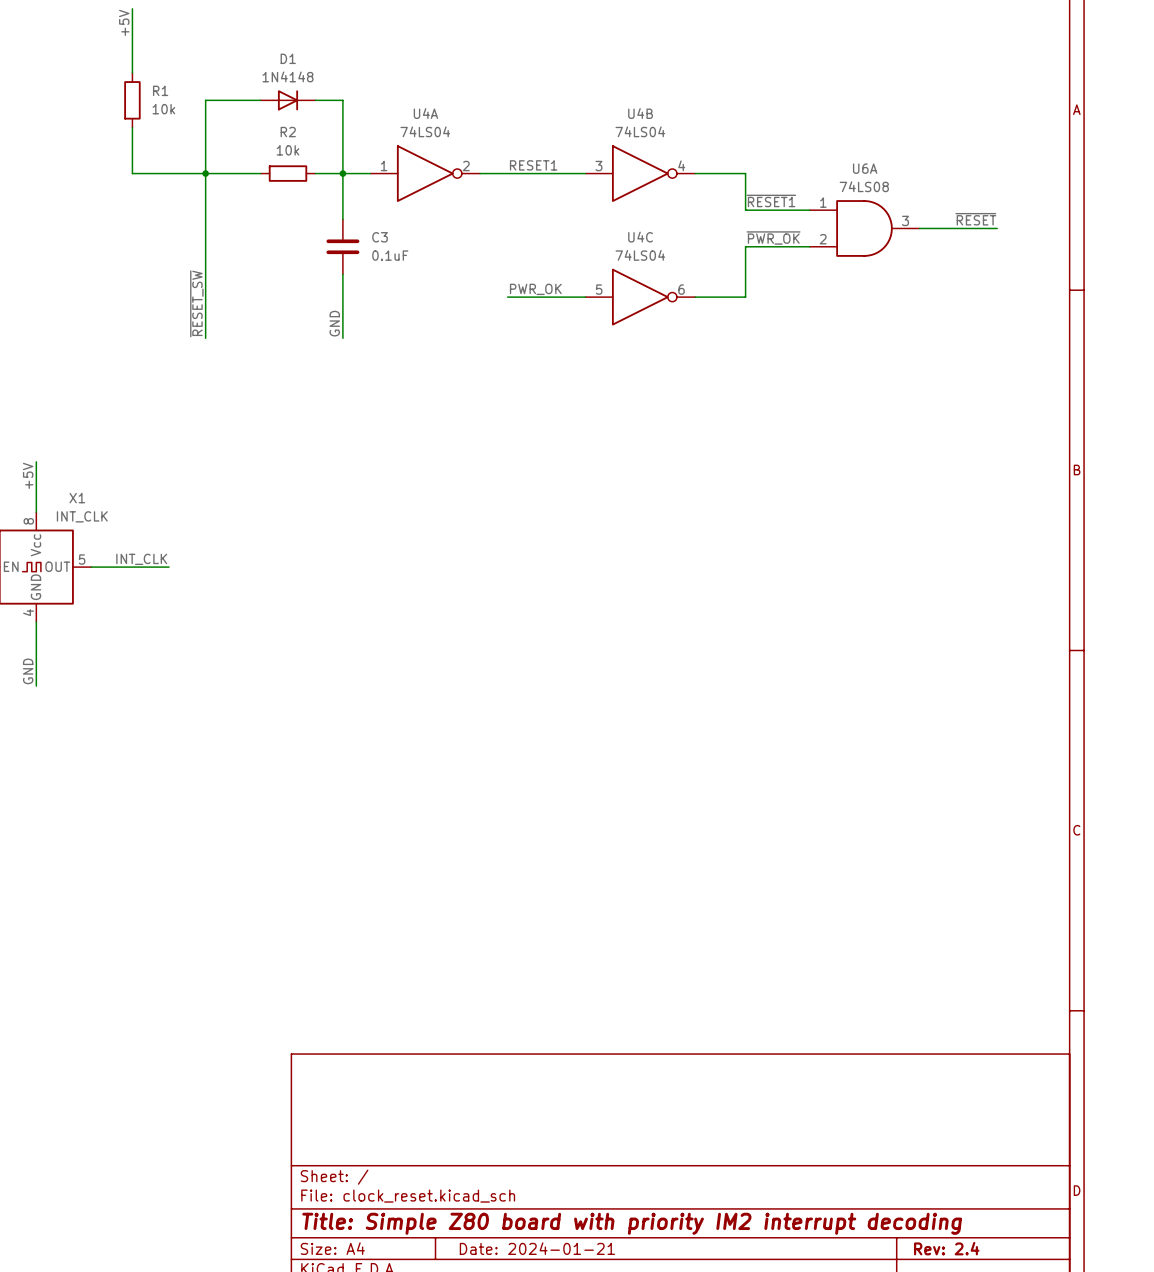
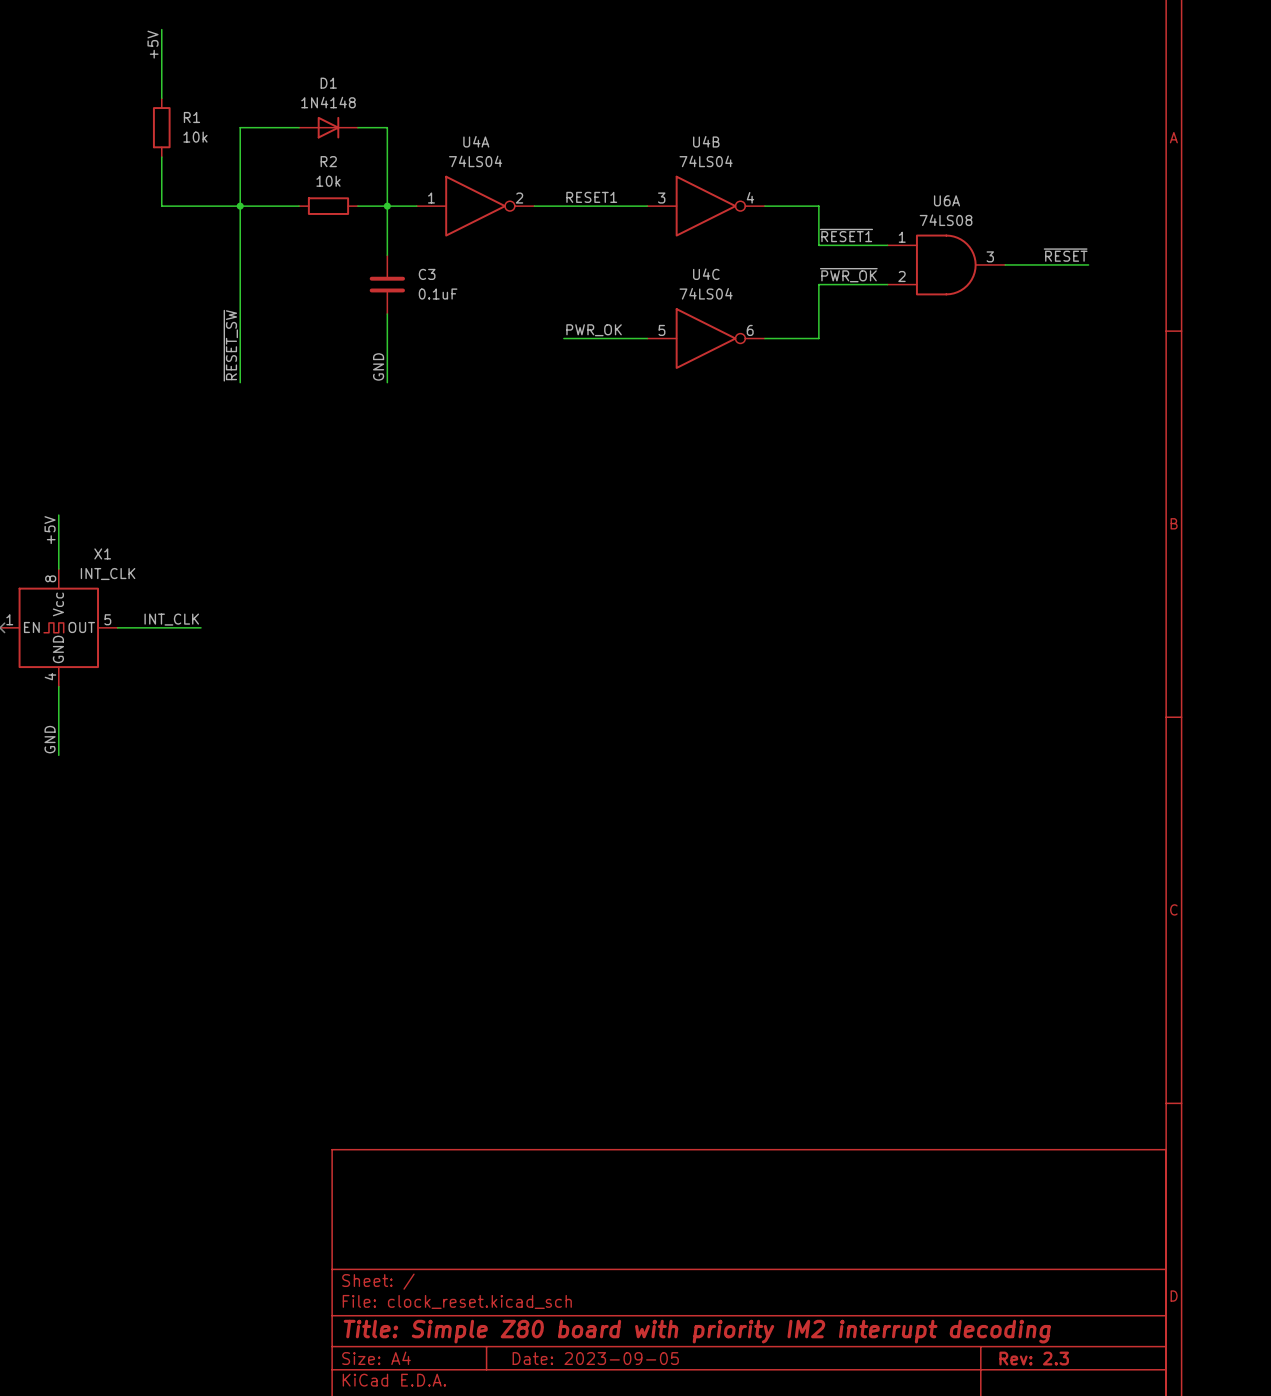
title block: Date: 2024-01-21 (537, 1248) -> Date: 2023-09-05 (595, 1358)
title block: Rev: 2.4 (946, 1248) -> Rev: 2.3 (1034, 1358)

